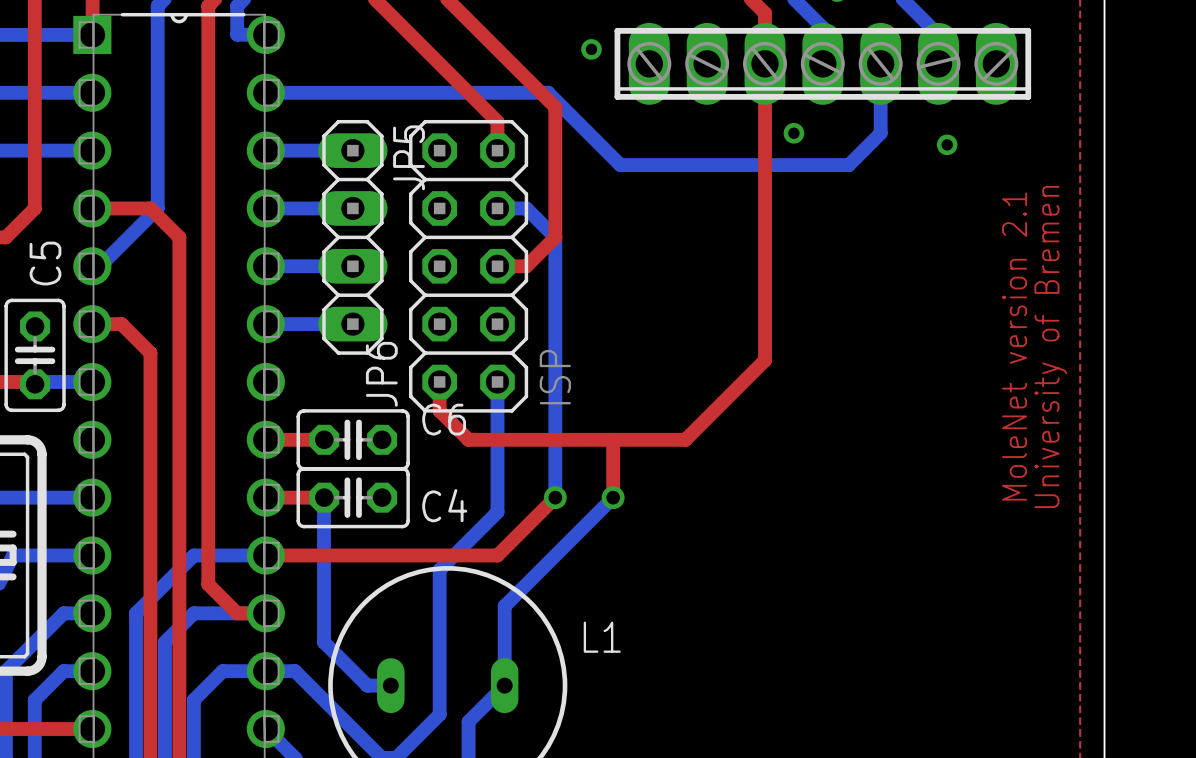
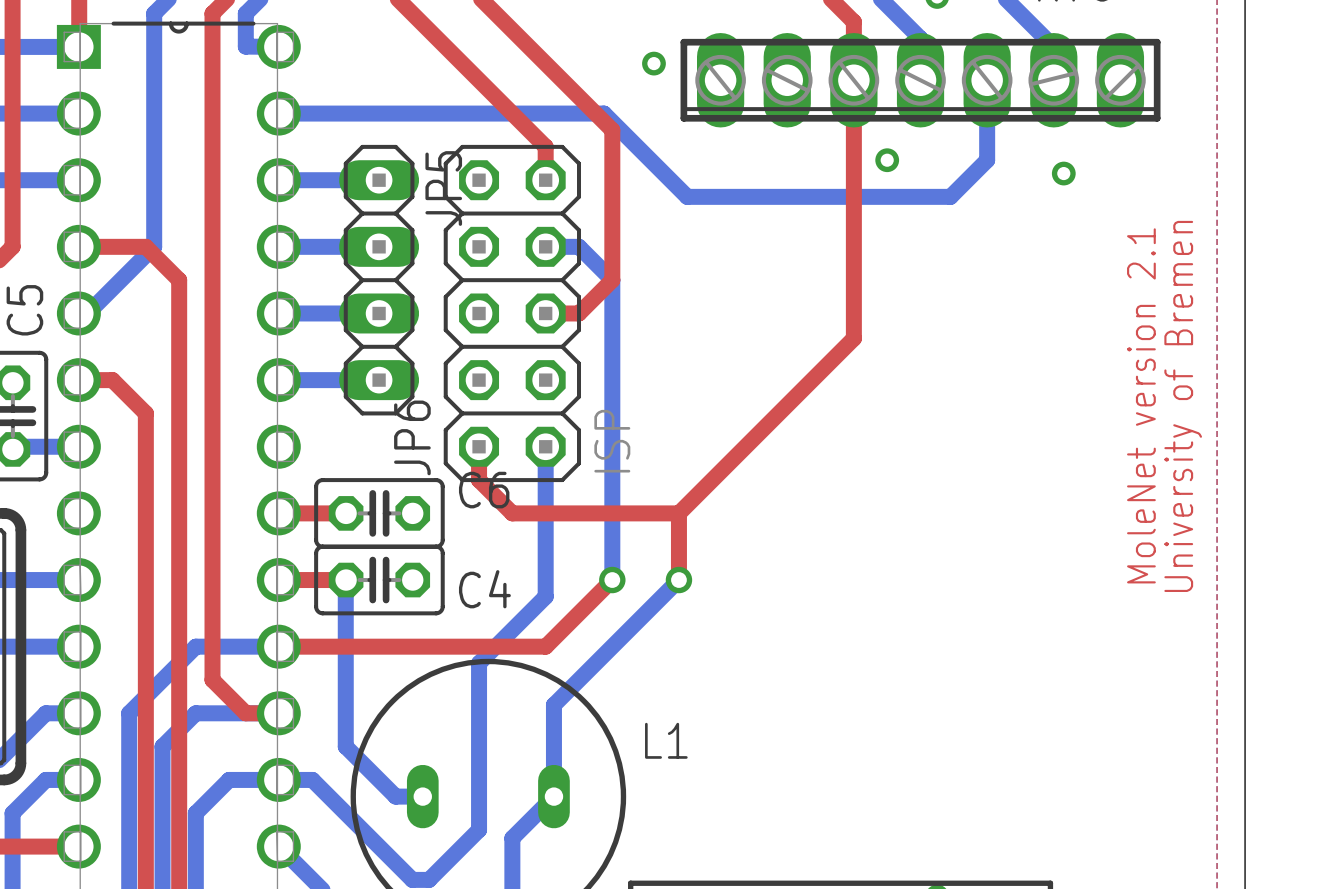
top track: (765, 287) (765, 360) (685, 439) (613, 439) -> (853, 338) (678, 513)

